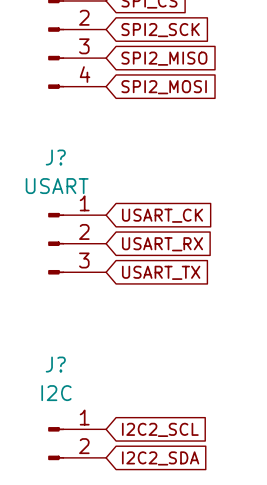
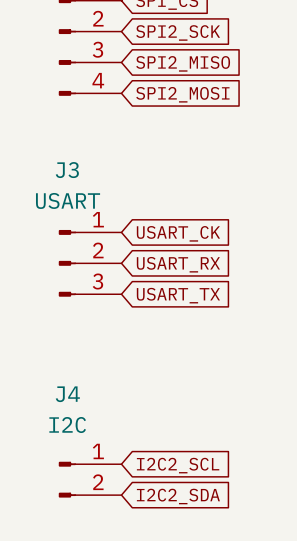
J? name: J? (55, 157) -> J3 (67, 170)
J? name: J? (55, 364) -> J4 (67, 394)

